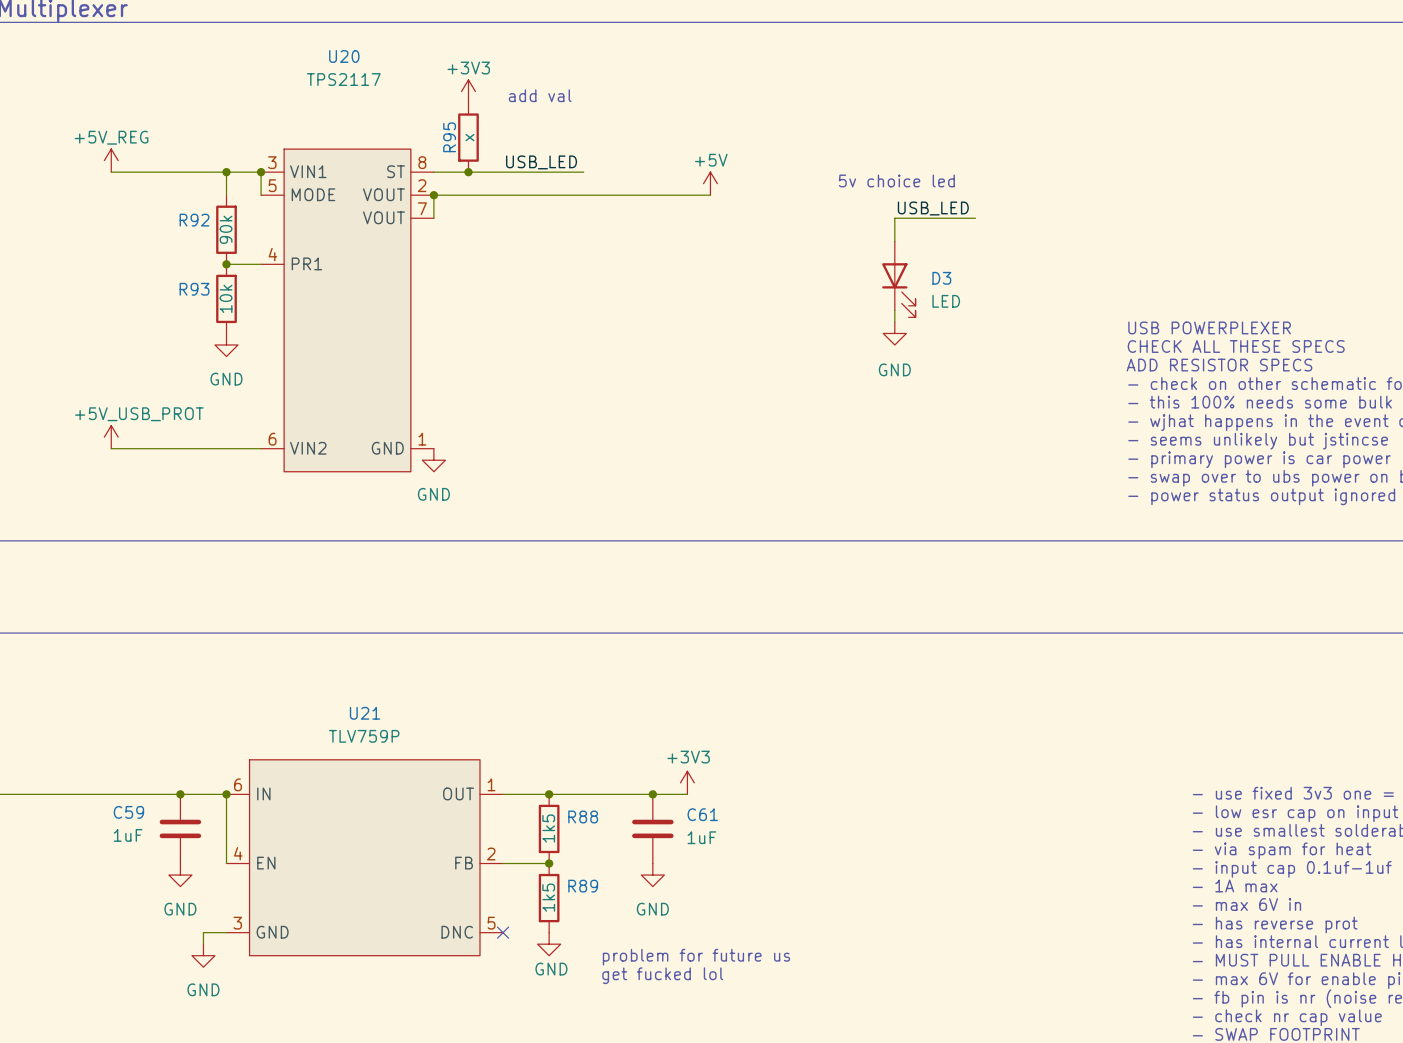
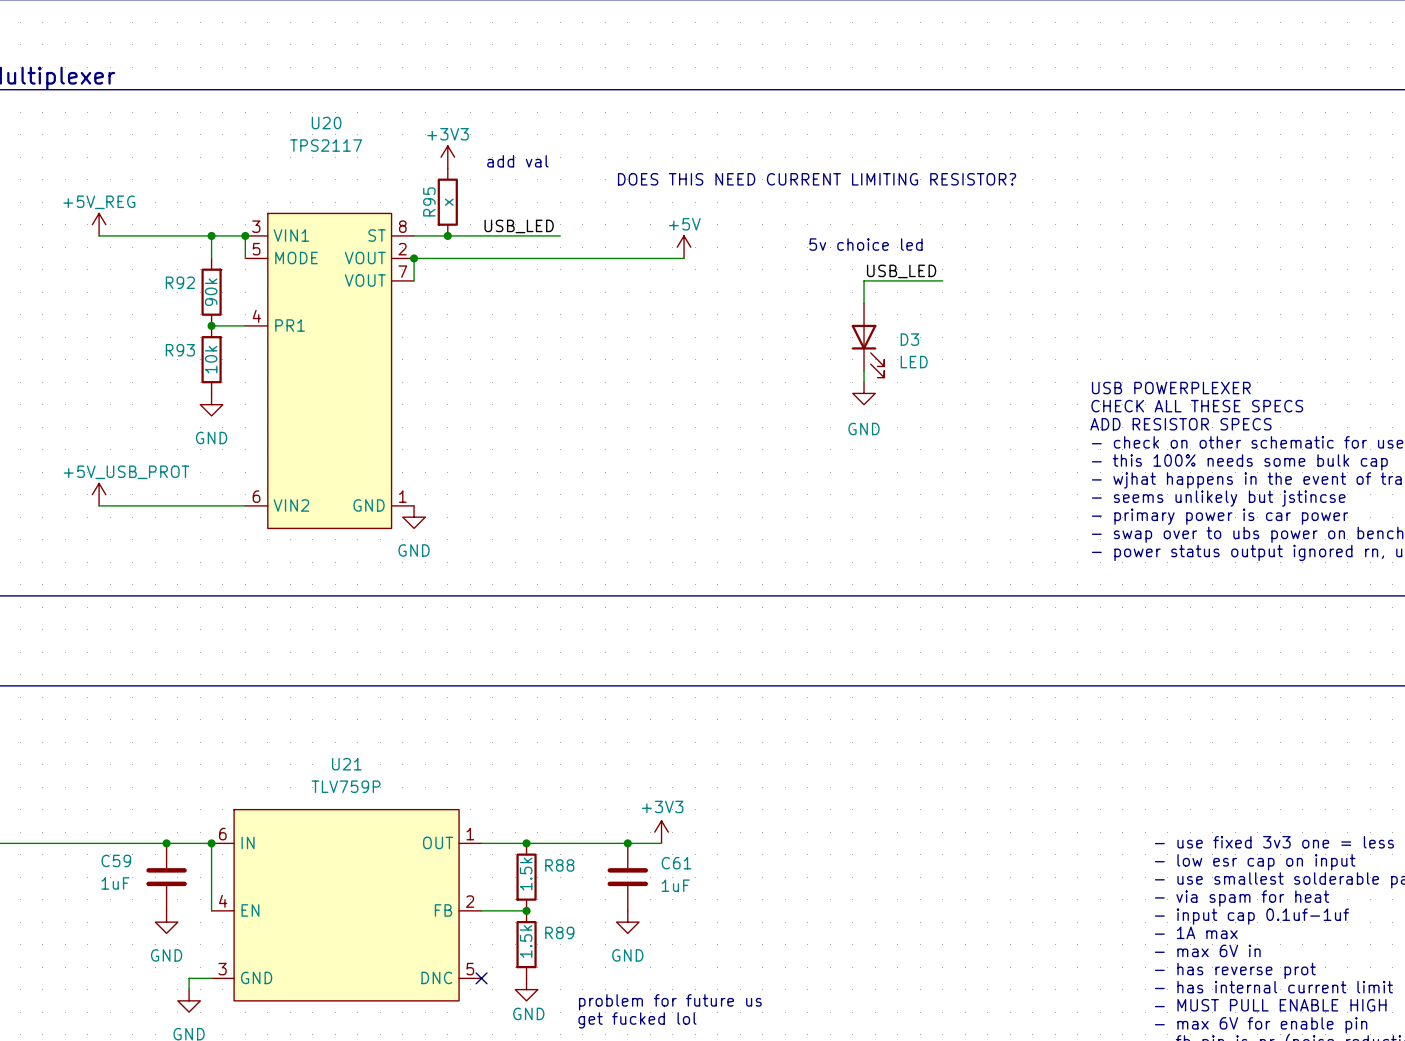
text: none -> DOES THIS NEED CURRENT LIMITING RESISTOR? (817, 179)
R88 value: 1k5 (548, 828) -> 1.5k (526, 874)
R89 value: 1k5 (548, 897) -> 1.5k (526, 941)

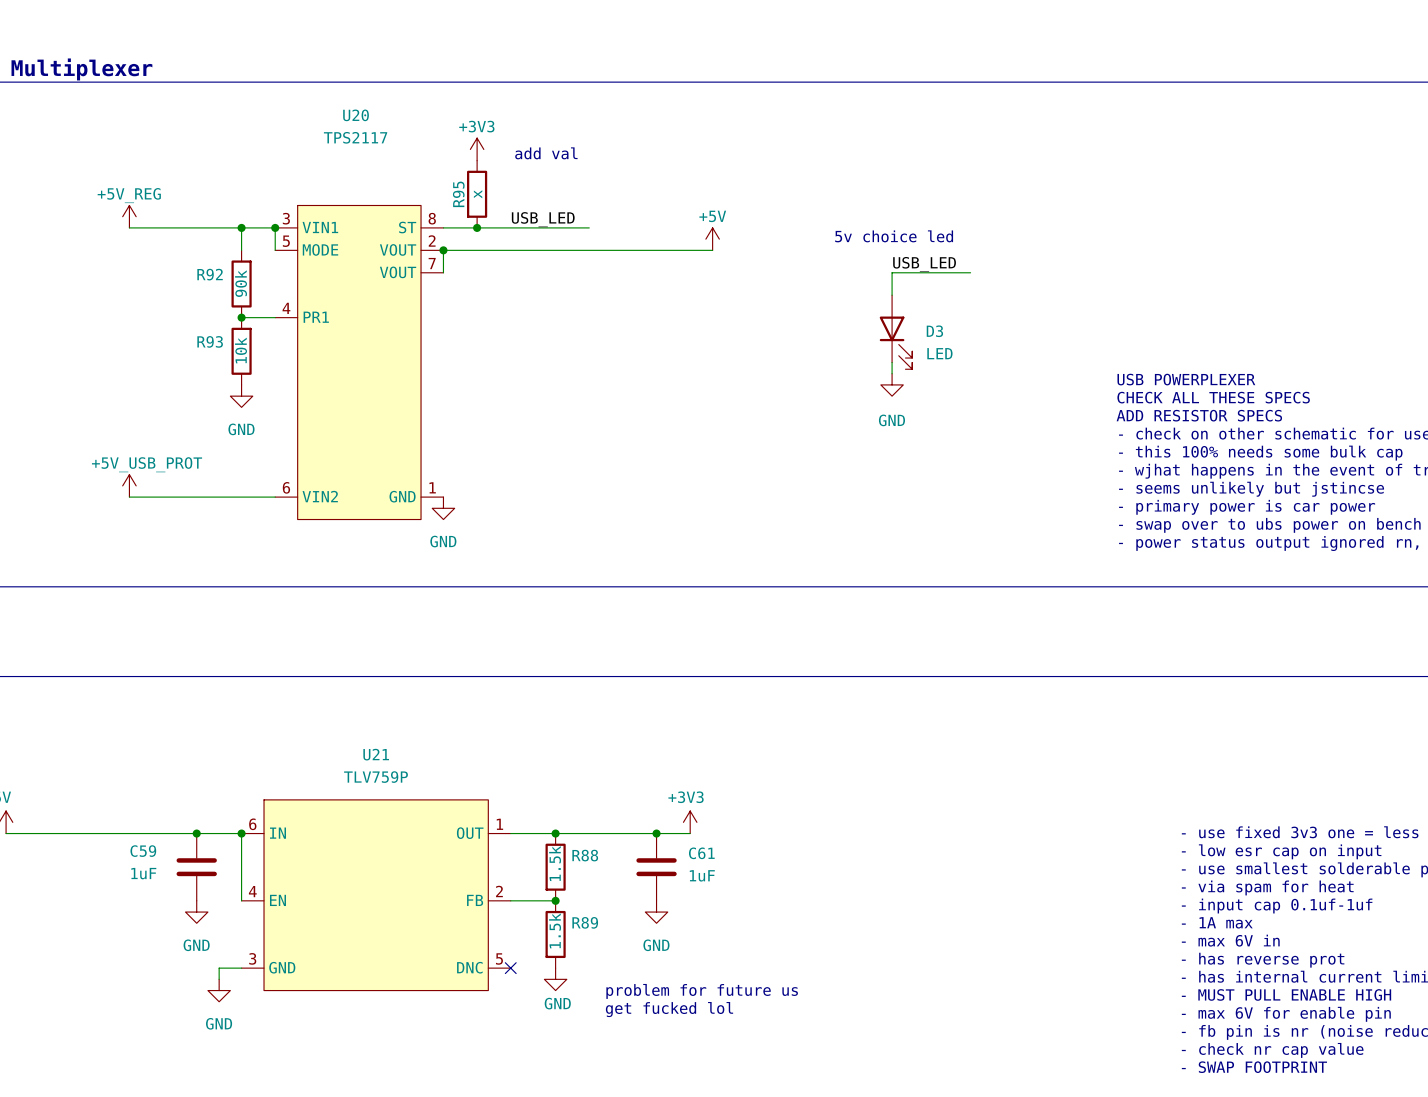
text: DOES THIS NEED CURRENT LIMITING RESISTOR? (817, 179) -> none

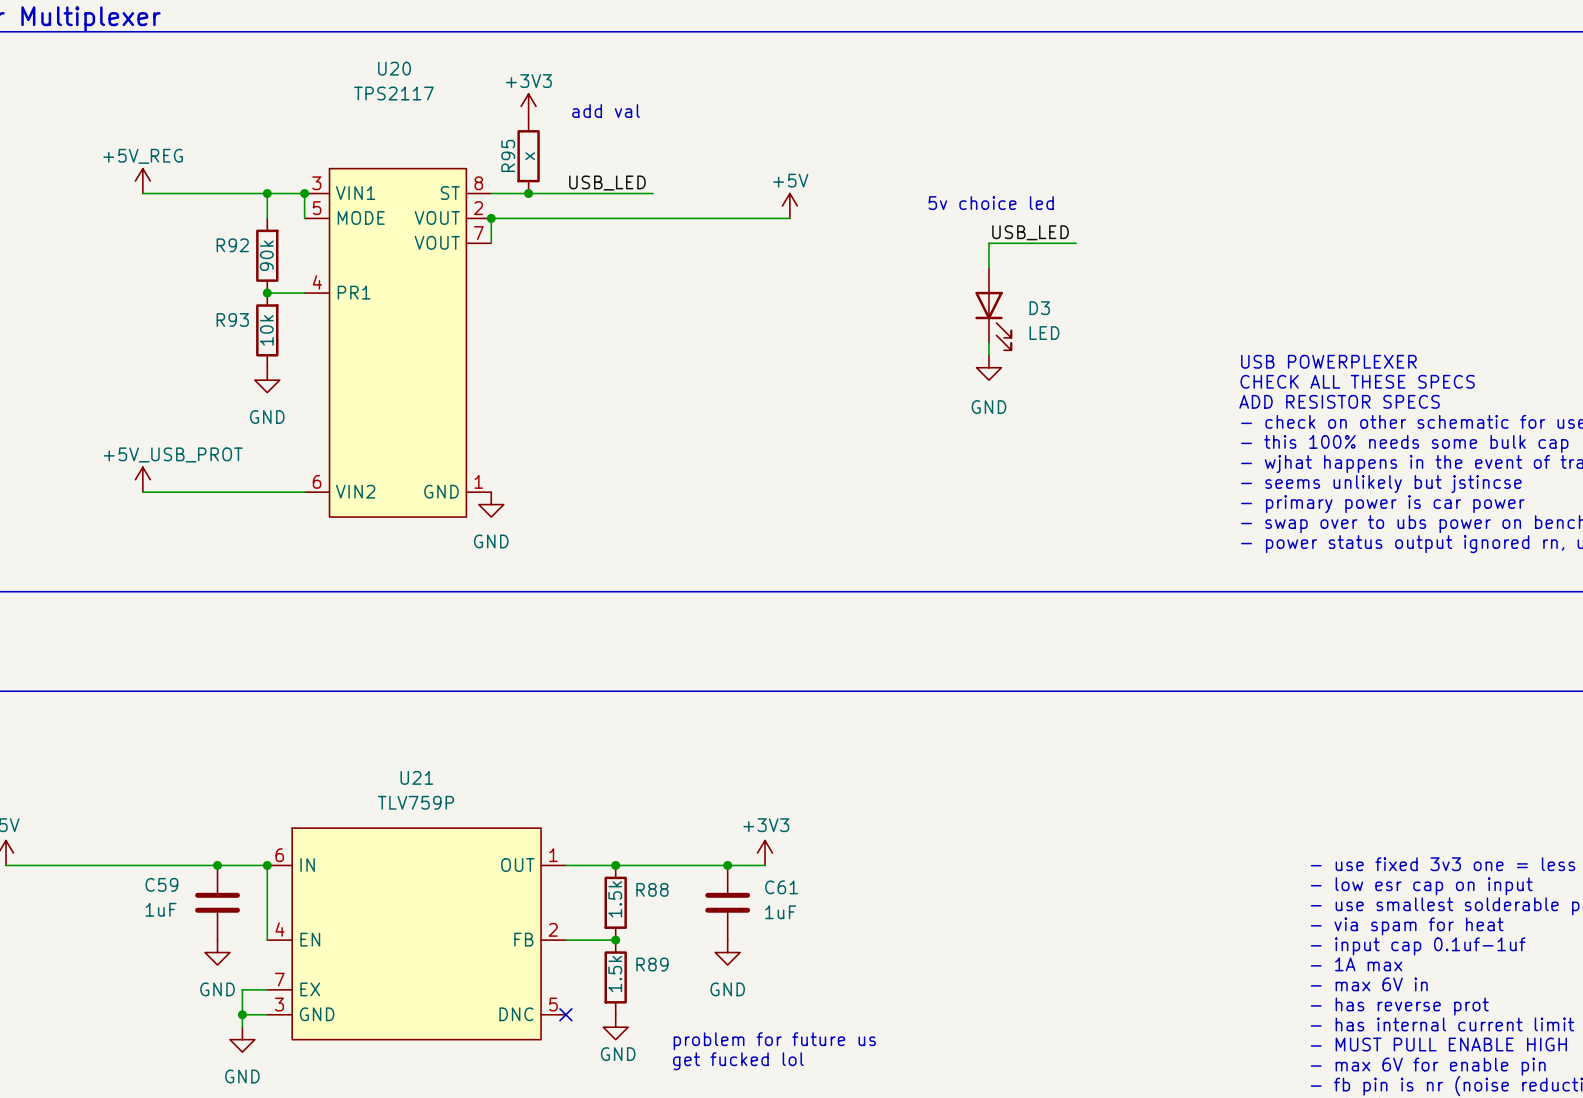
U21 symbol: [241, 799, 511, 991] -> [267, 828, 566, 1040]
wire: none -> (267, 989) (242, 989) (242, 1014)
junction: none -> (242, 1014)

